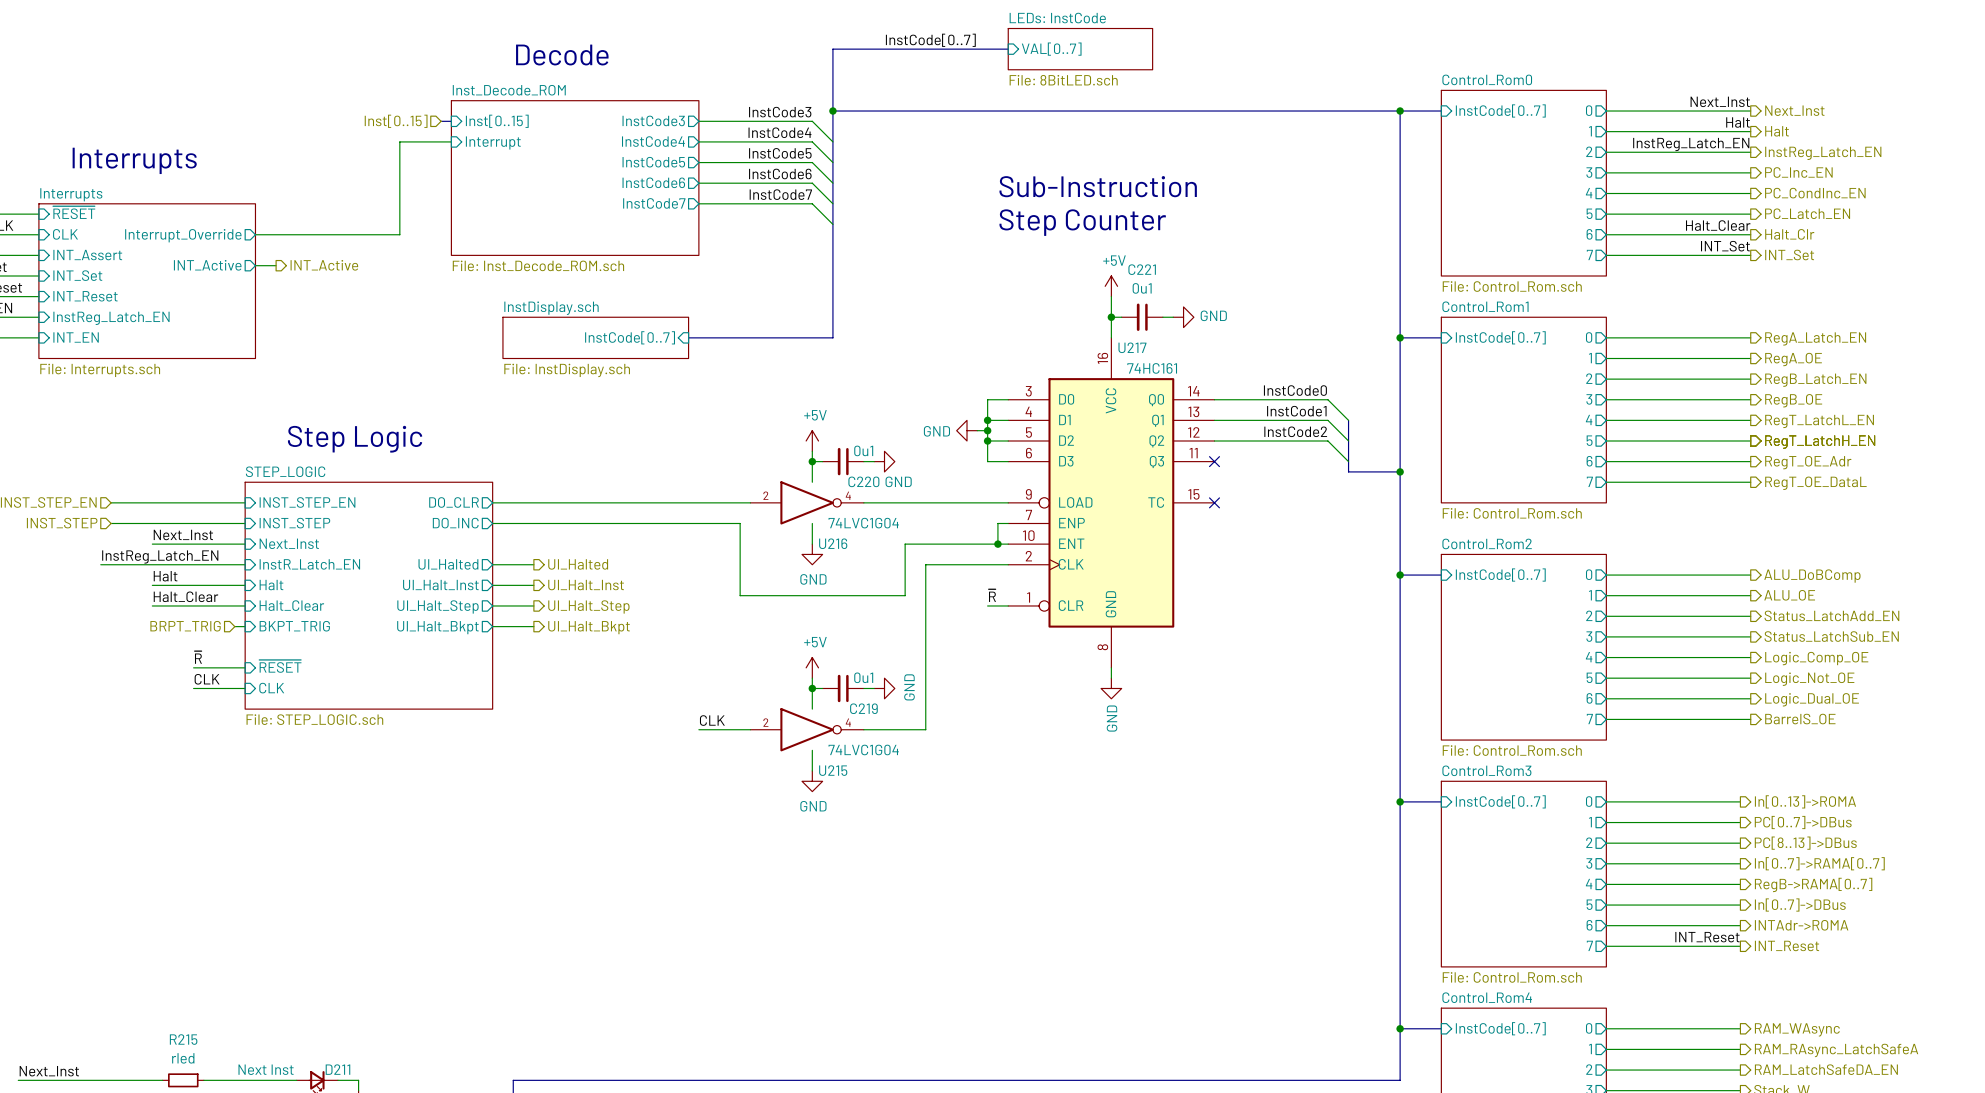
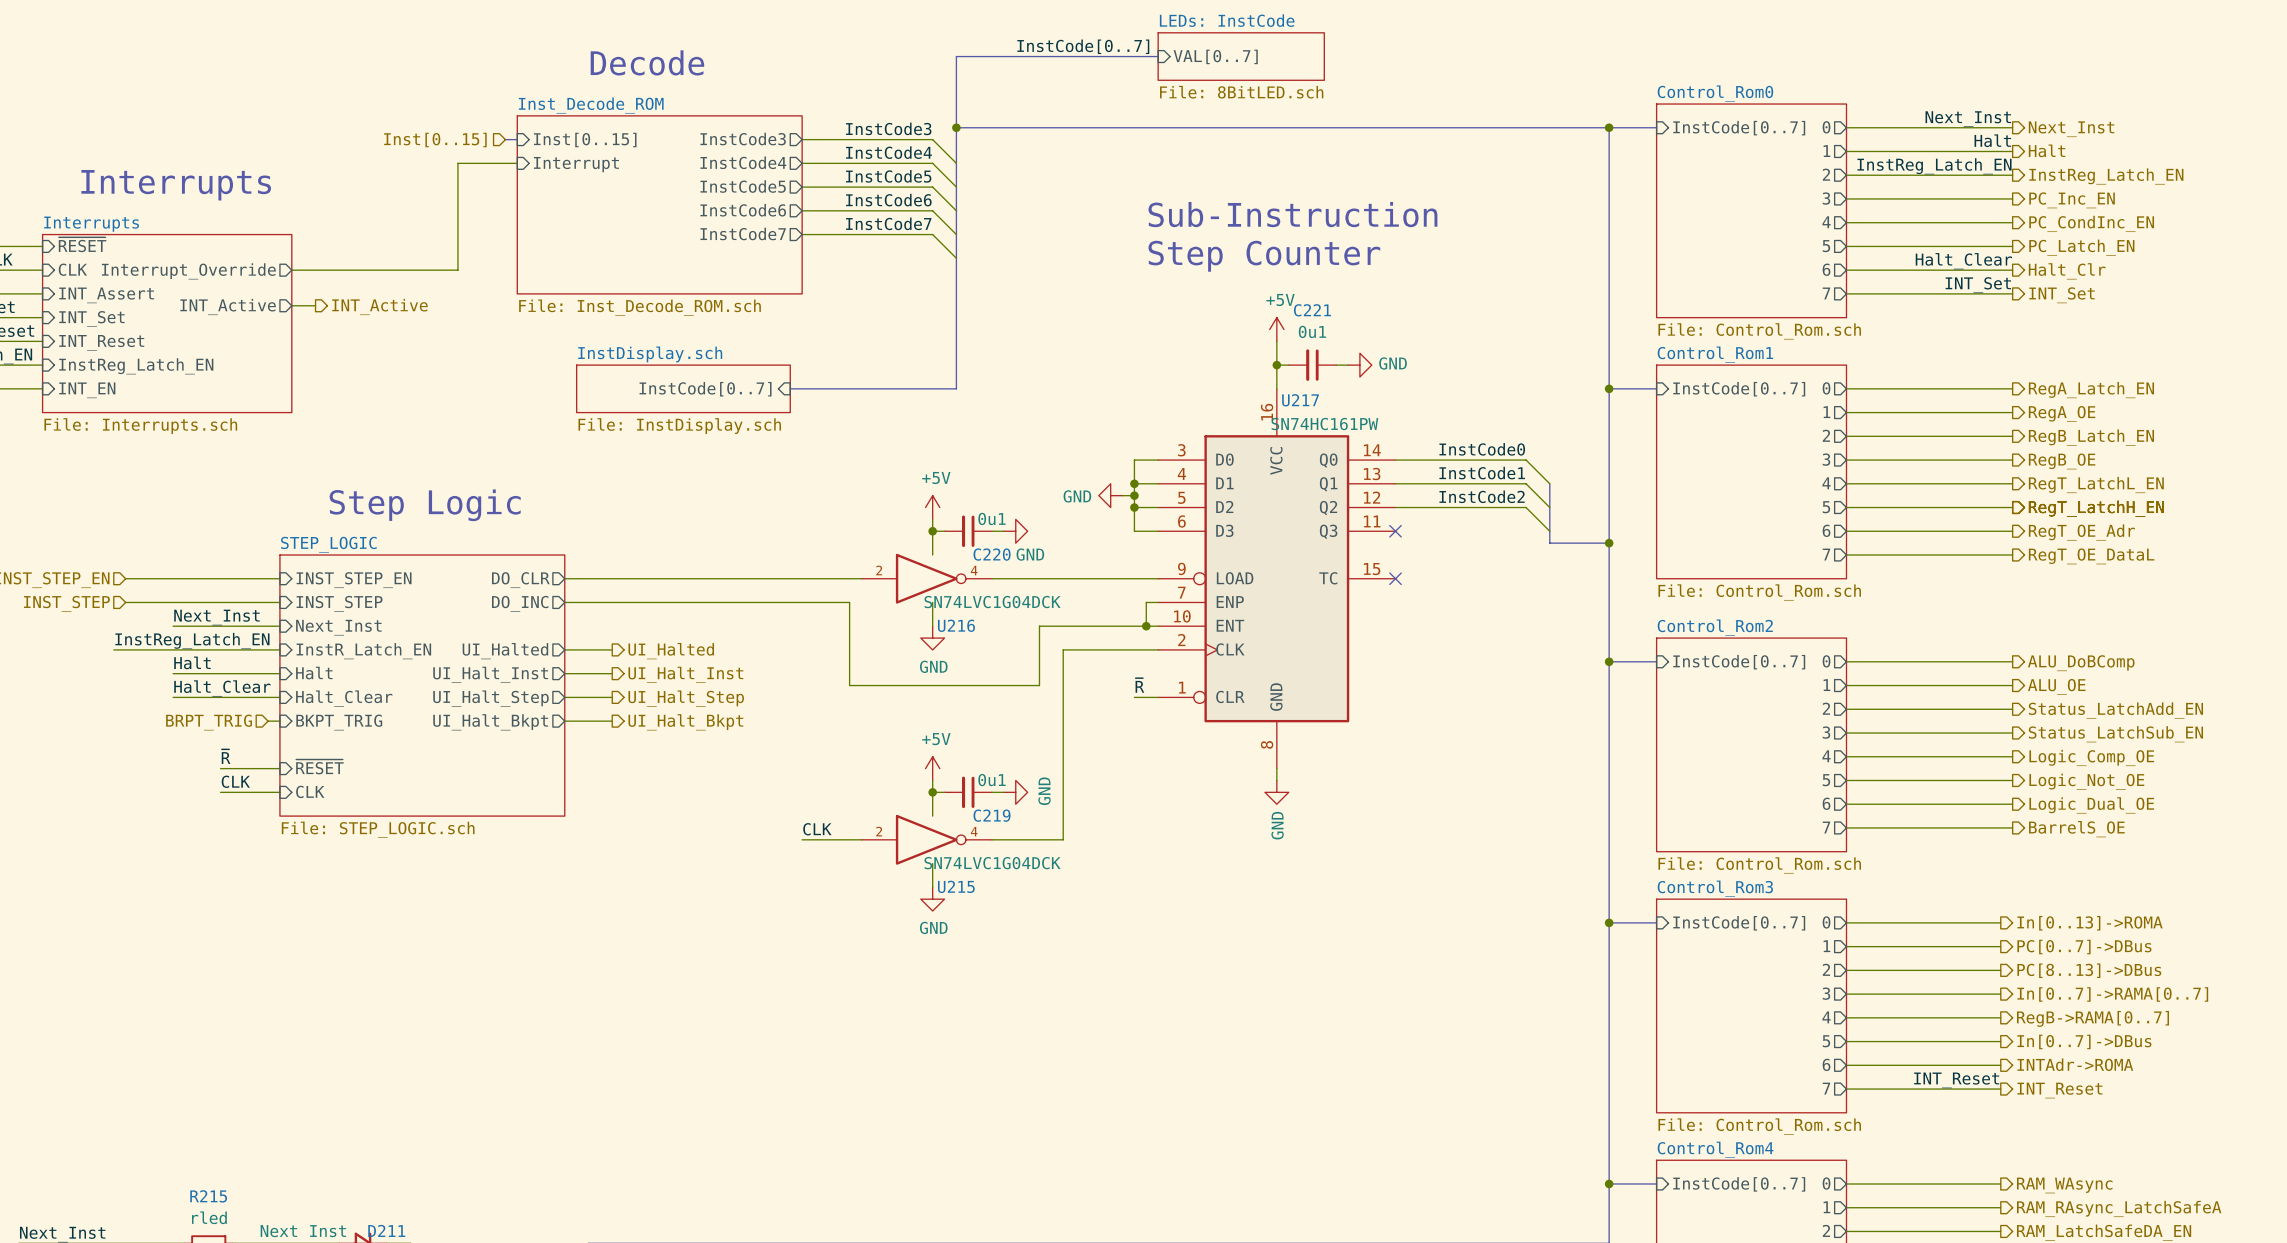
U217 value: 74HC161 (1152, 368) -> SN74HC161PW (1324, 424)
U216 value: 74LVC1G04 (863, 523) -> SN74LVC1G04DCK (992, 602)
U215 value: 74LVC1G04 (863, 749) -> SN74LVC1G04DCK (992, 863)

